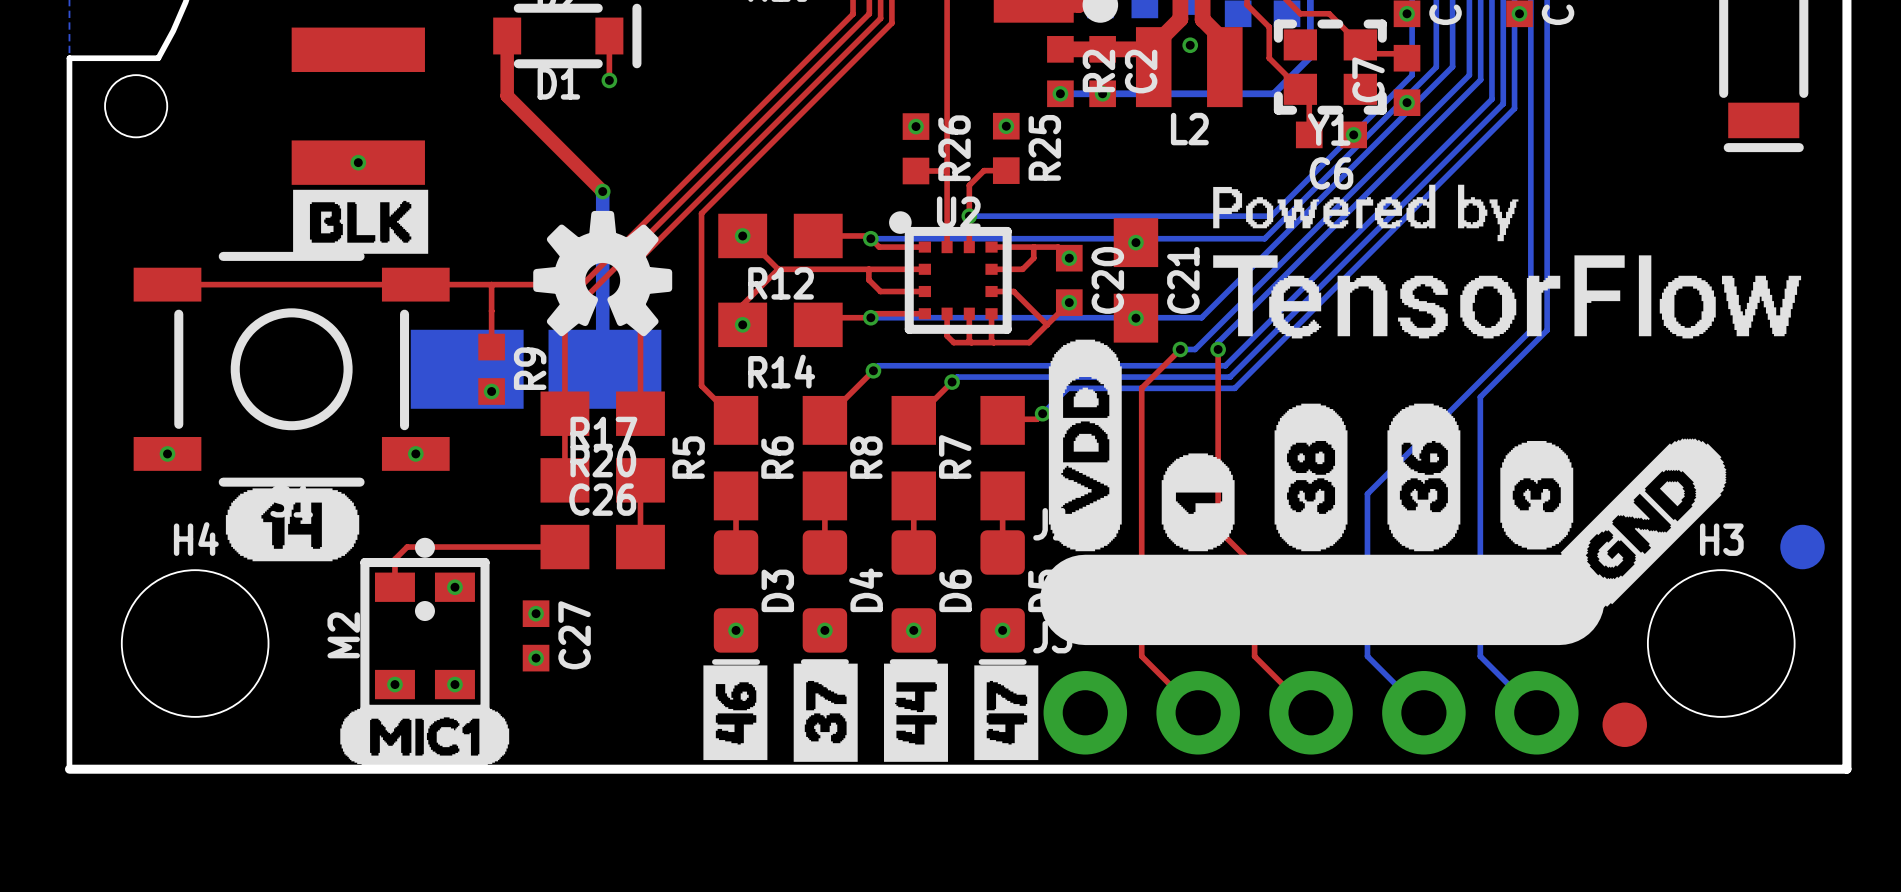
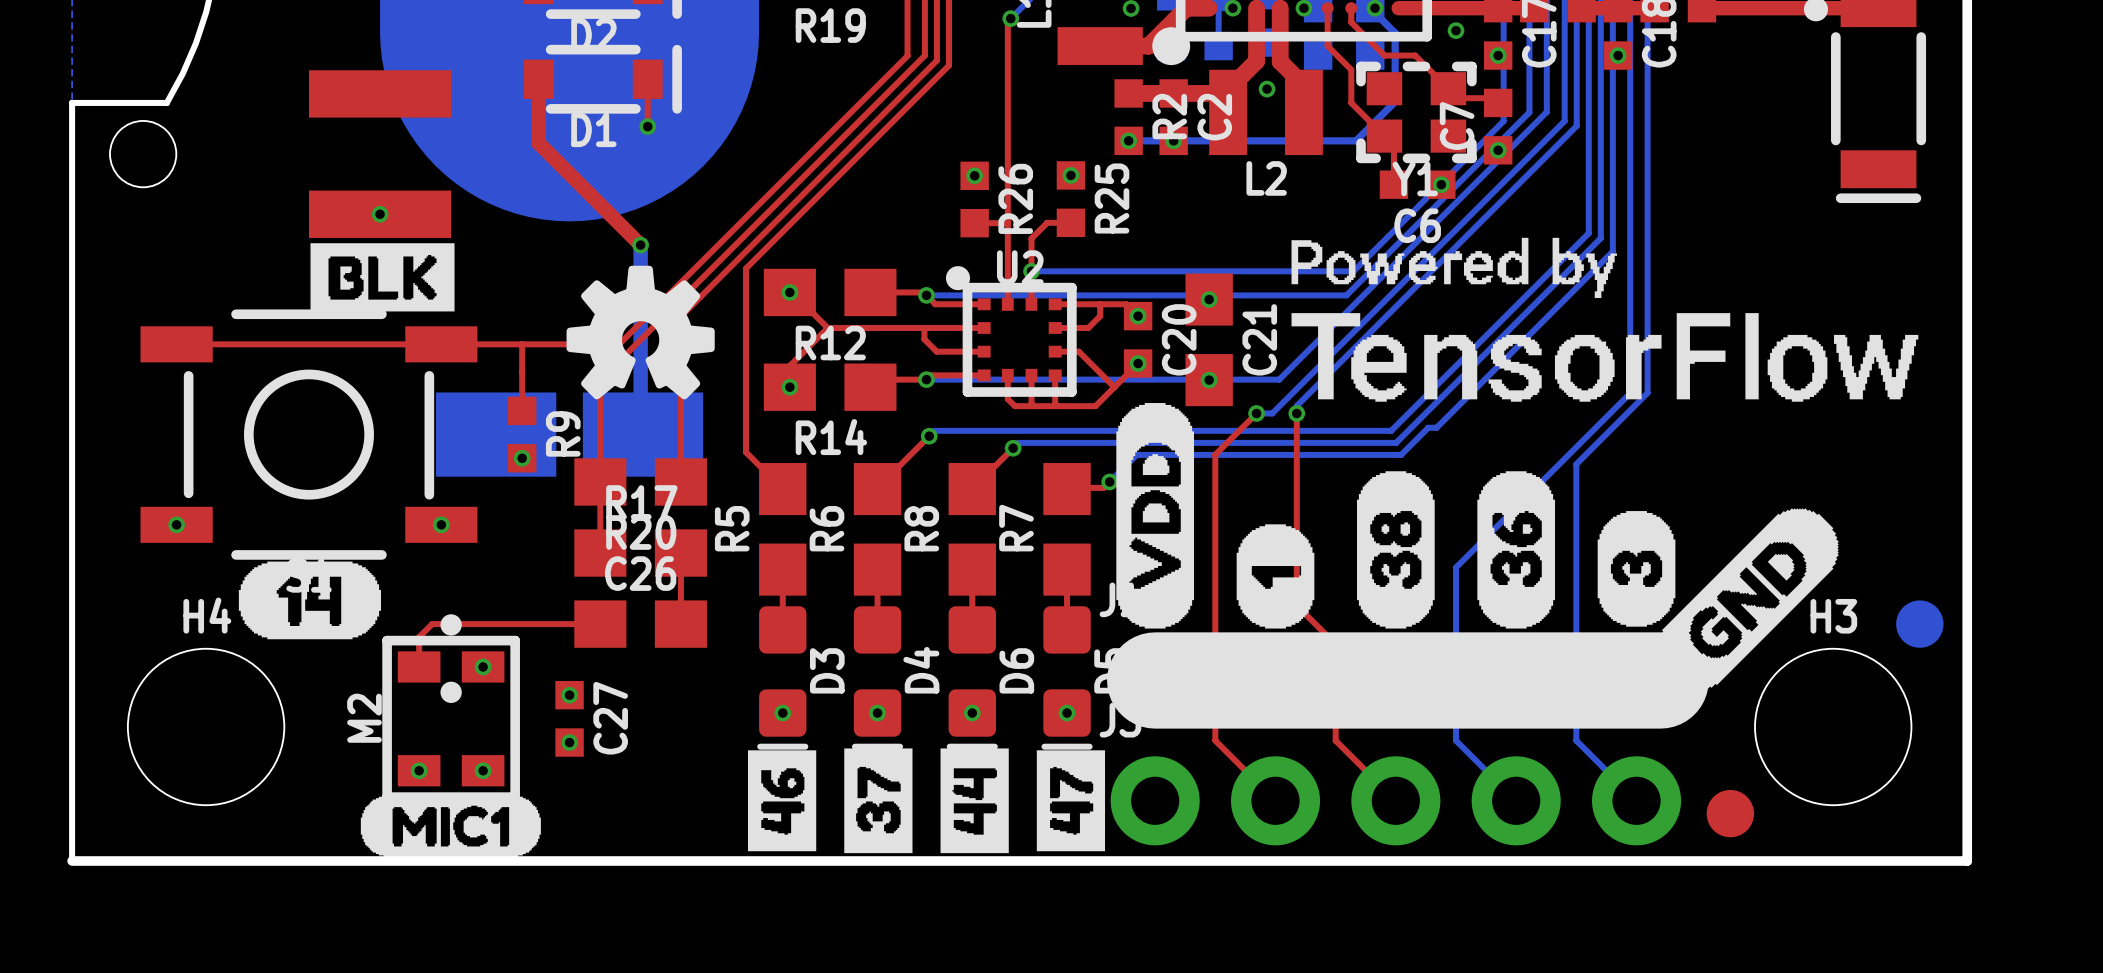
bottom track: (1491, 99) (1225, 365) -> (1588, 146) (1588, 233) (1391, 430) (1304, 430)
bottom track: (1503, 103) (1230, 377) -> (1600, 151) (1600, 238) (1396, 442) (1309, 442)
bottom track: (1514, 108) (1234, 388) -> (1612, 156) (1612, 251) (1436, 427) (1428, 427) (1401, 454) (1314, 454)

